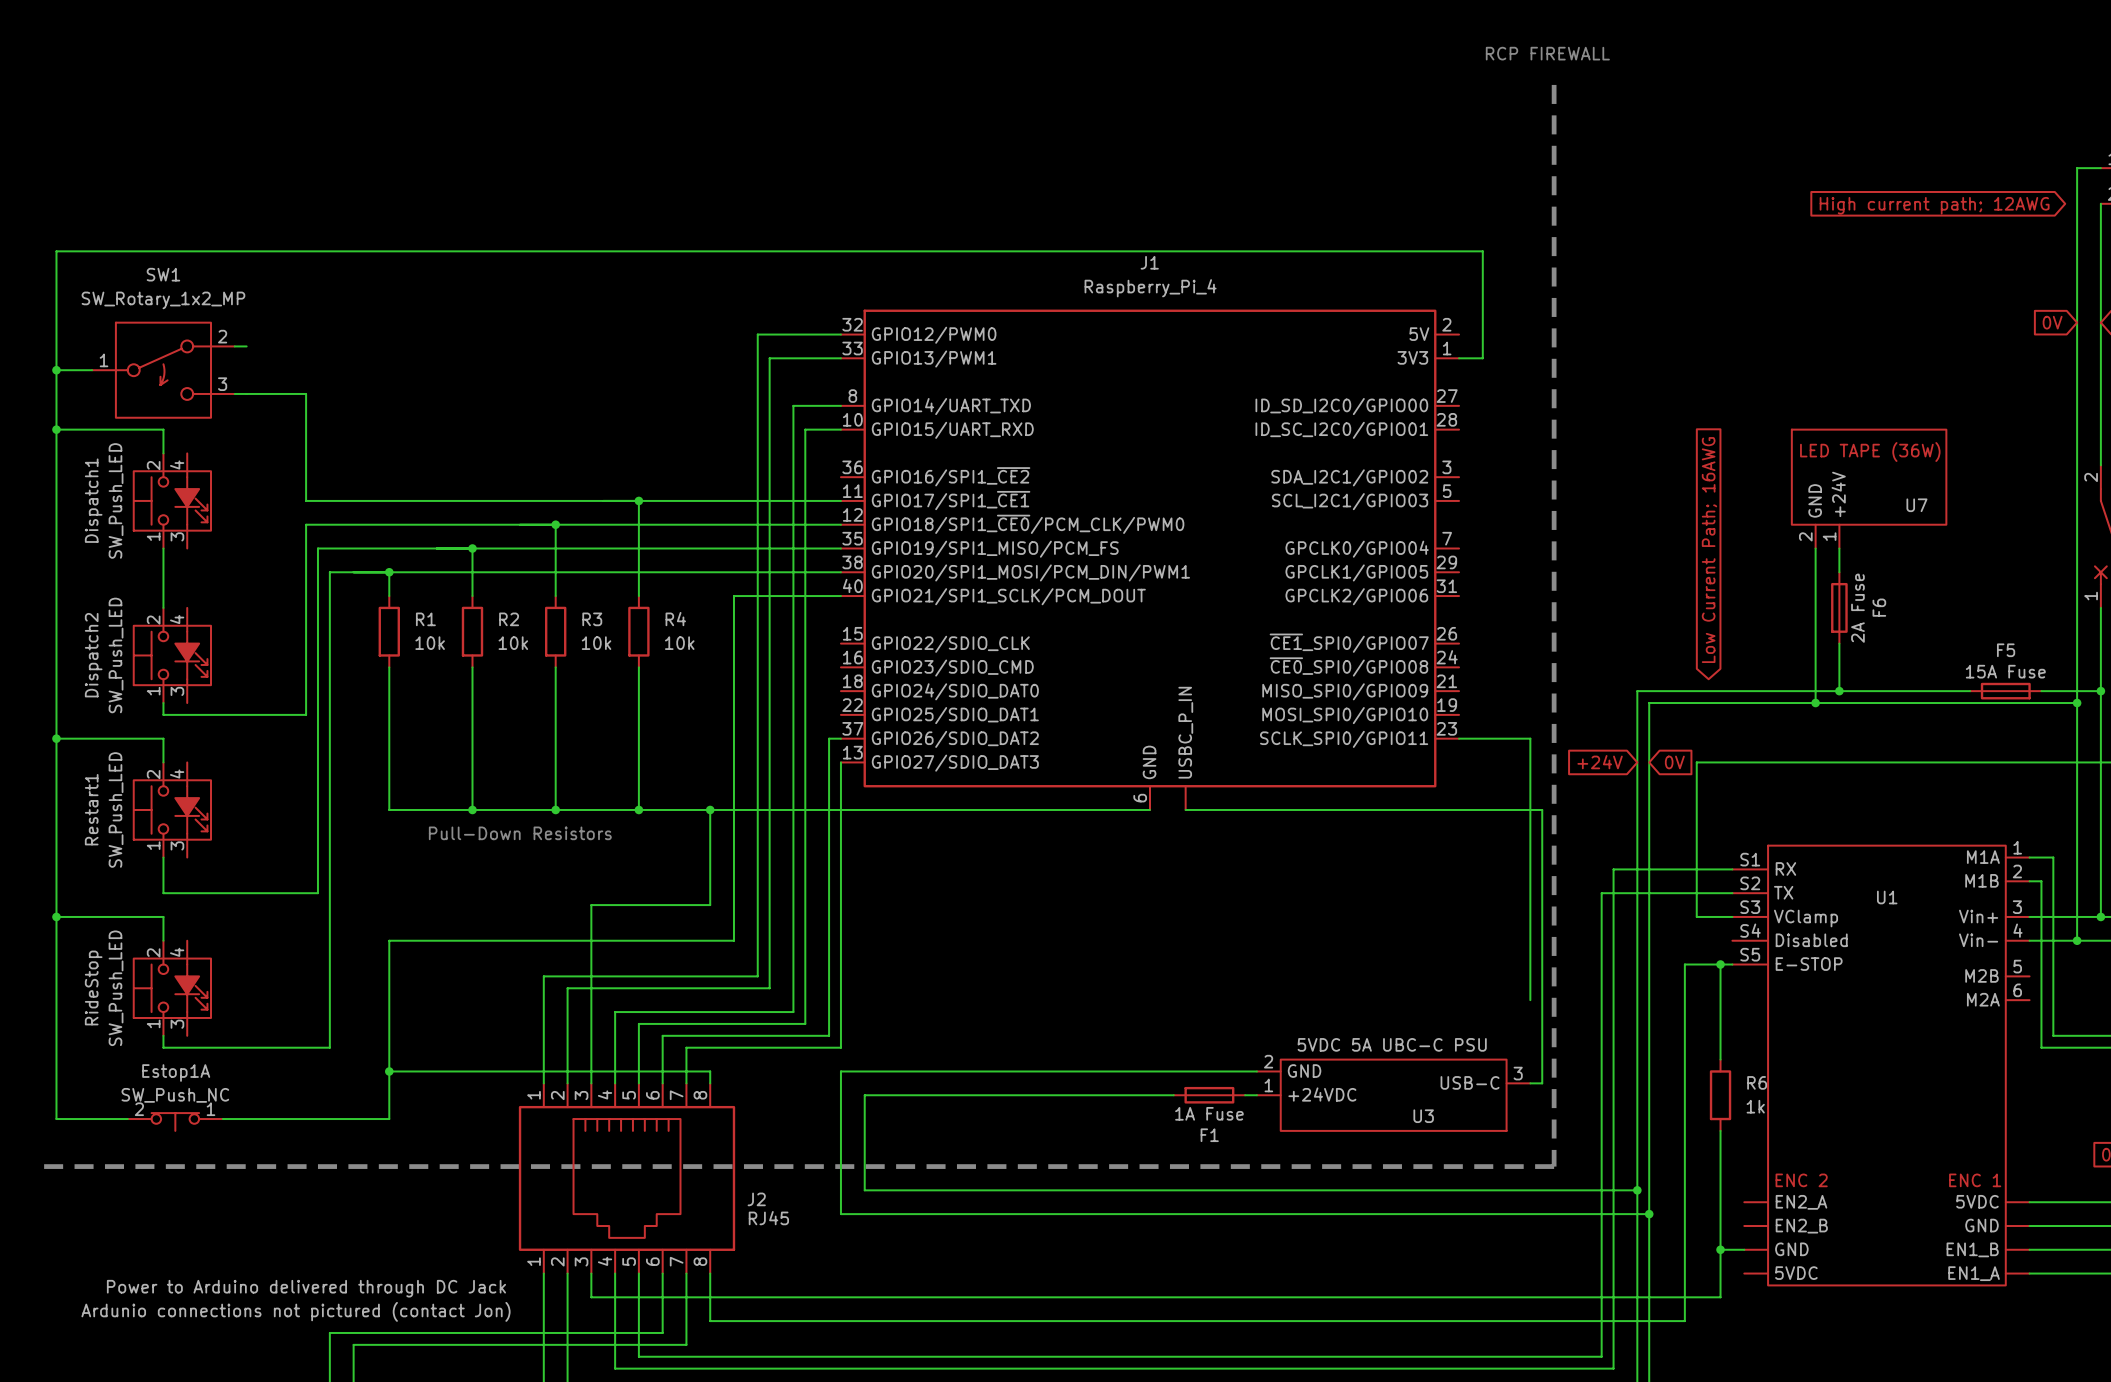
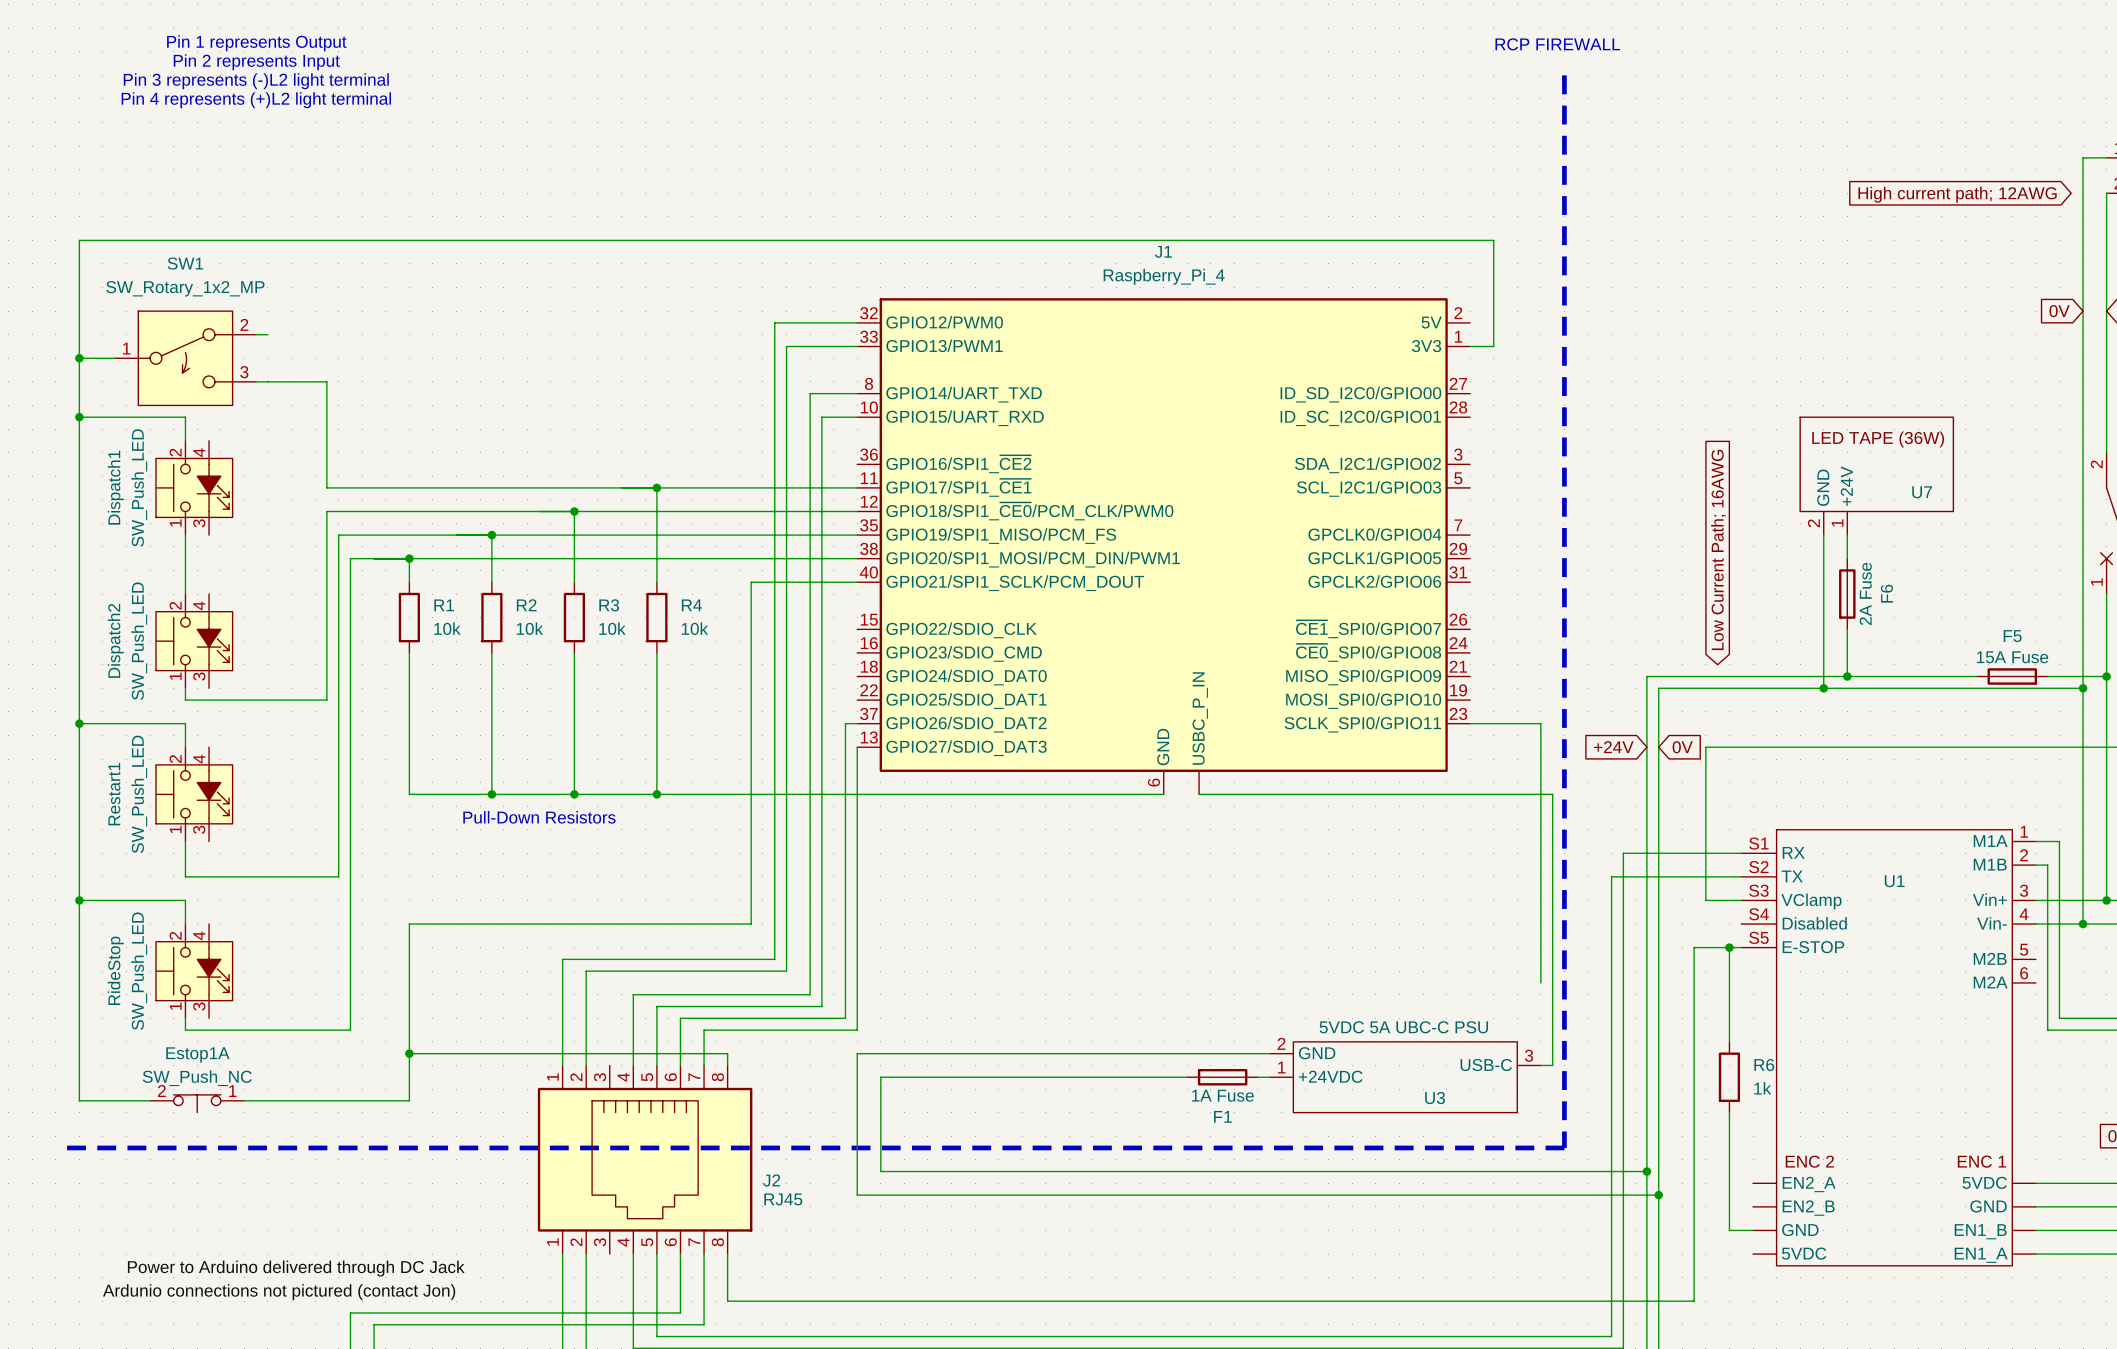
text: none -> Pin 1 represents Output (256, 43)
text: none -> Pin 2 represents Input (256, 62)
text: none -> Pin 3 represents (-)L2 light terminal (256, 81)
text: none -> Pin 4 represents (+)L2 light terminal (256, 100)
wire: (710, 809) (710, 905) (591, 905) (591, 1083) -> none
junction: (710, 809) -> none
wire: (1720, 1249) (1720, 1297) (591, 1297) (591, 1273) -> none
junction: (1720, 1249) -> none

